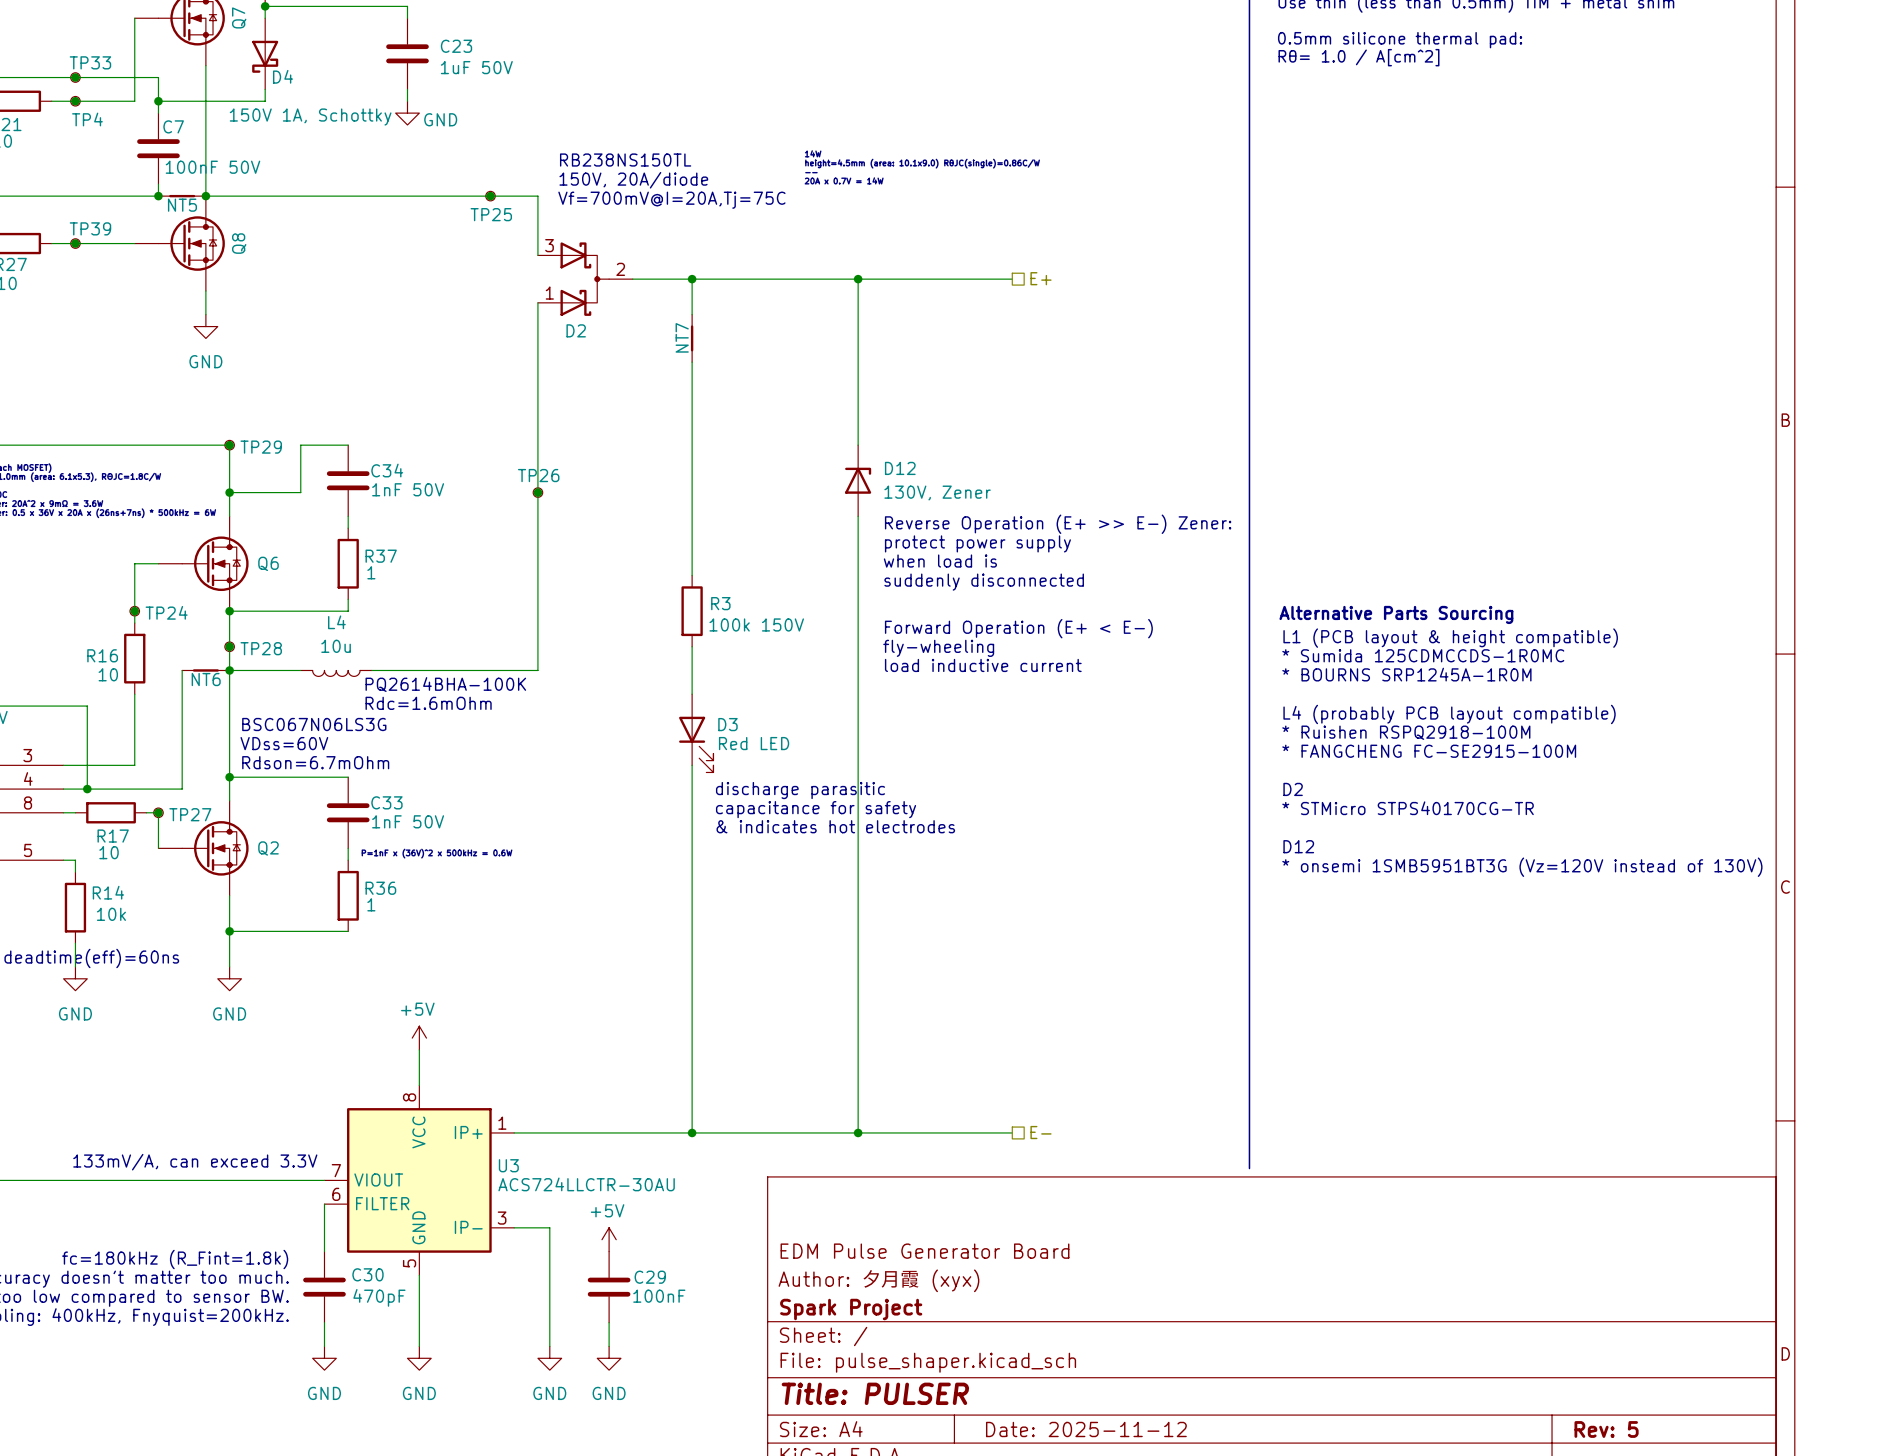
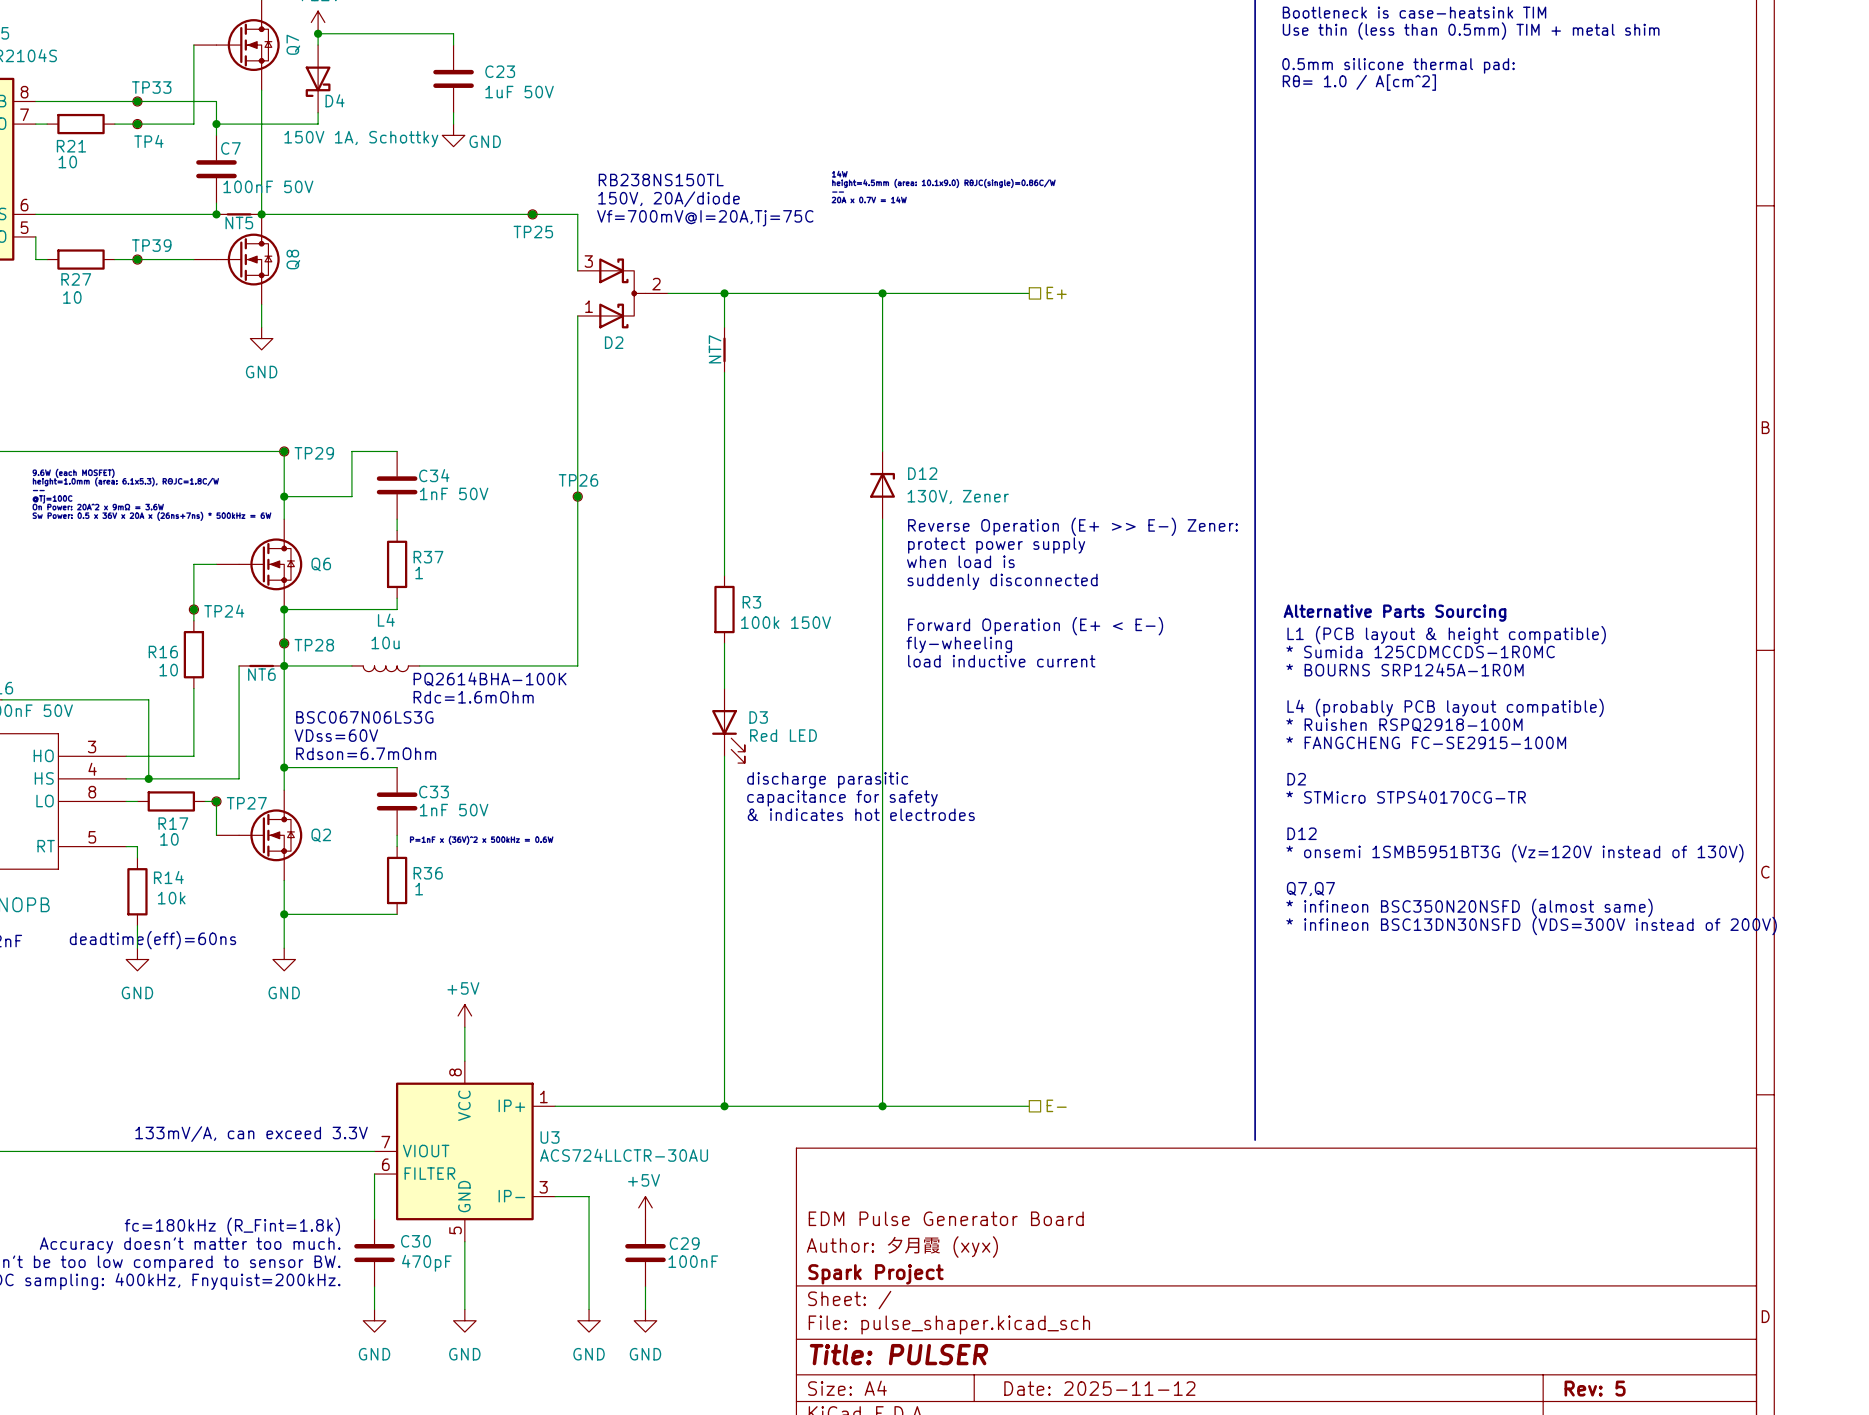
text: none -> Q7,Q7 (1310, 889)
text: none -> * infineon BSC350N20NSFD (almost same) (1469, 907)
text: none -> * infineon BSC13DN30NSFD (VDS=300V instead of 200V) (1531, 925)

